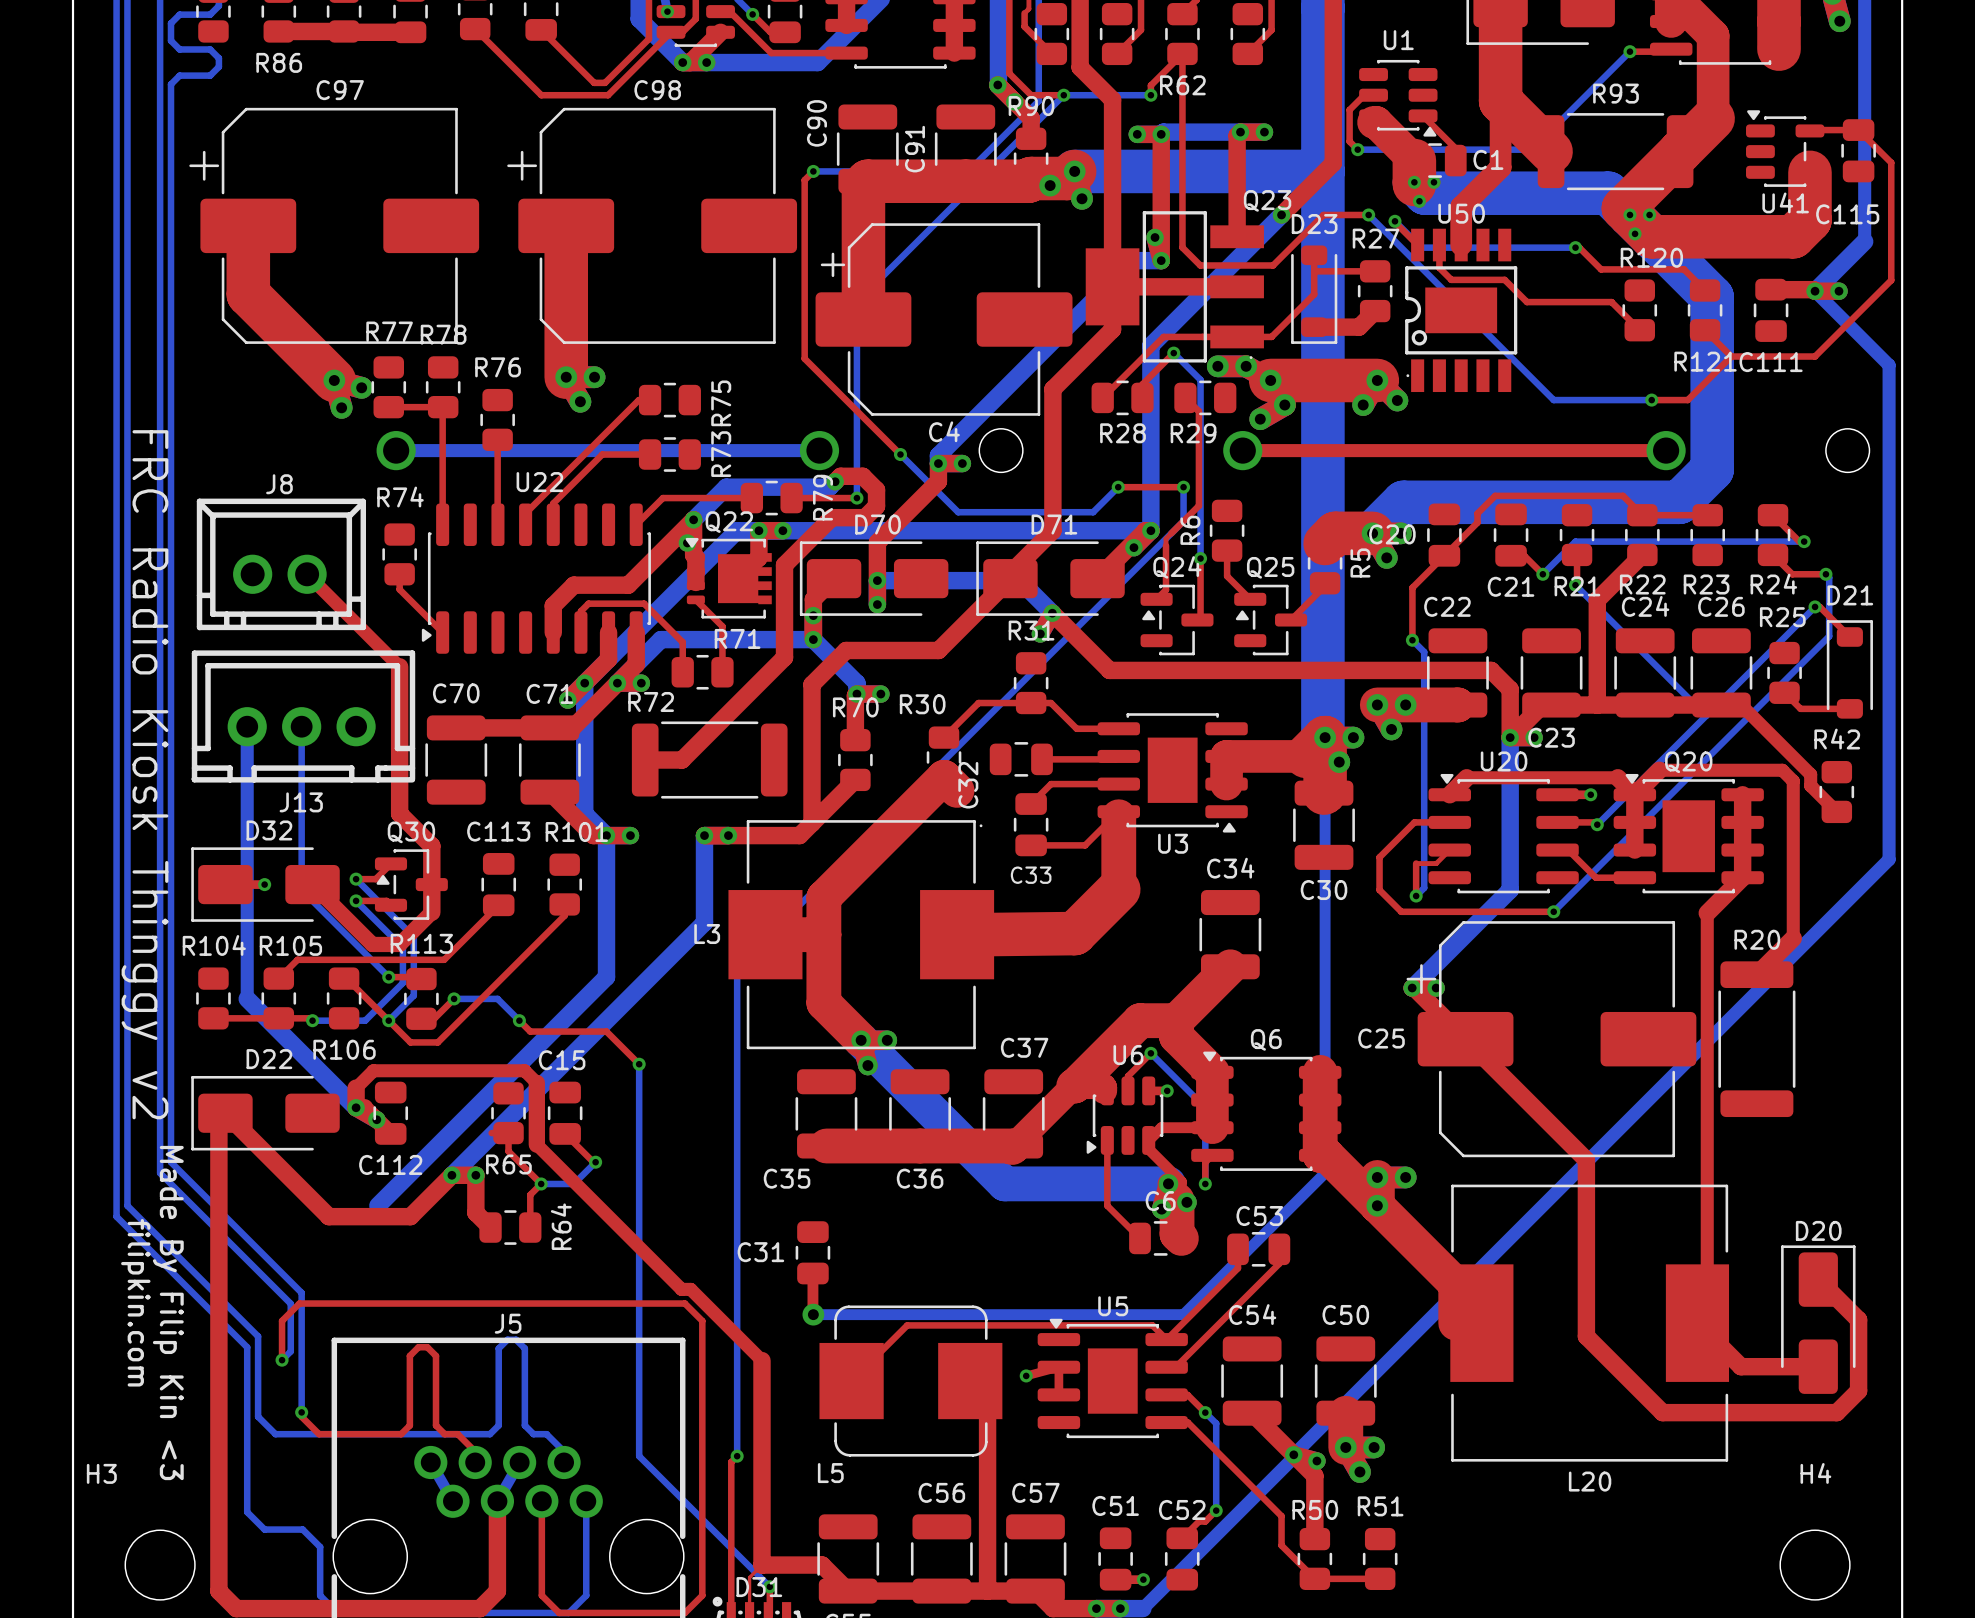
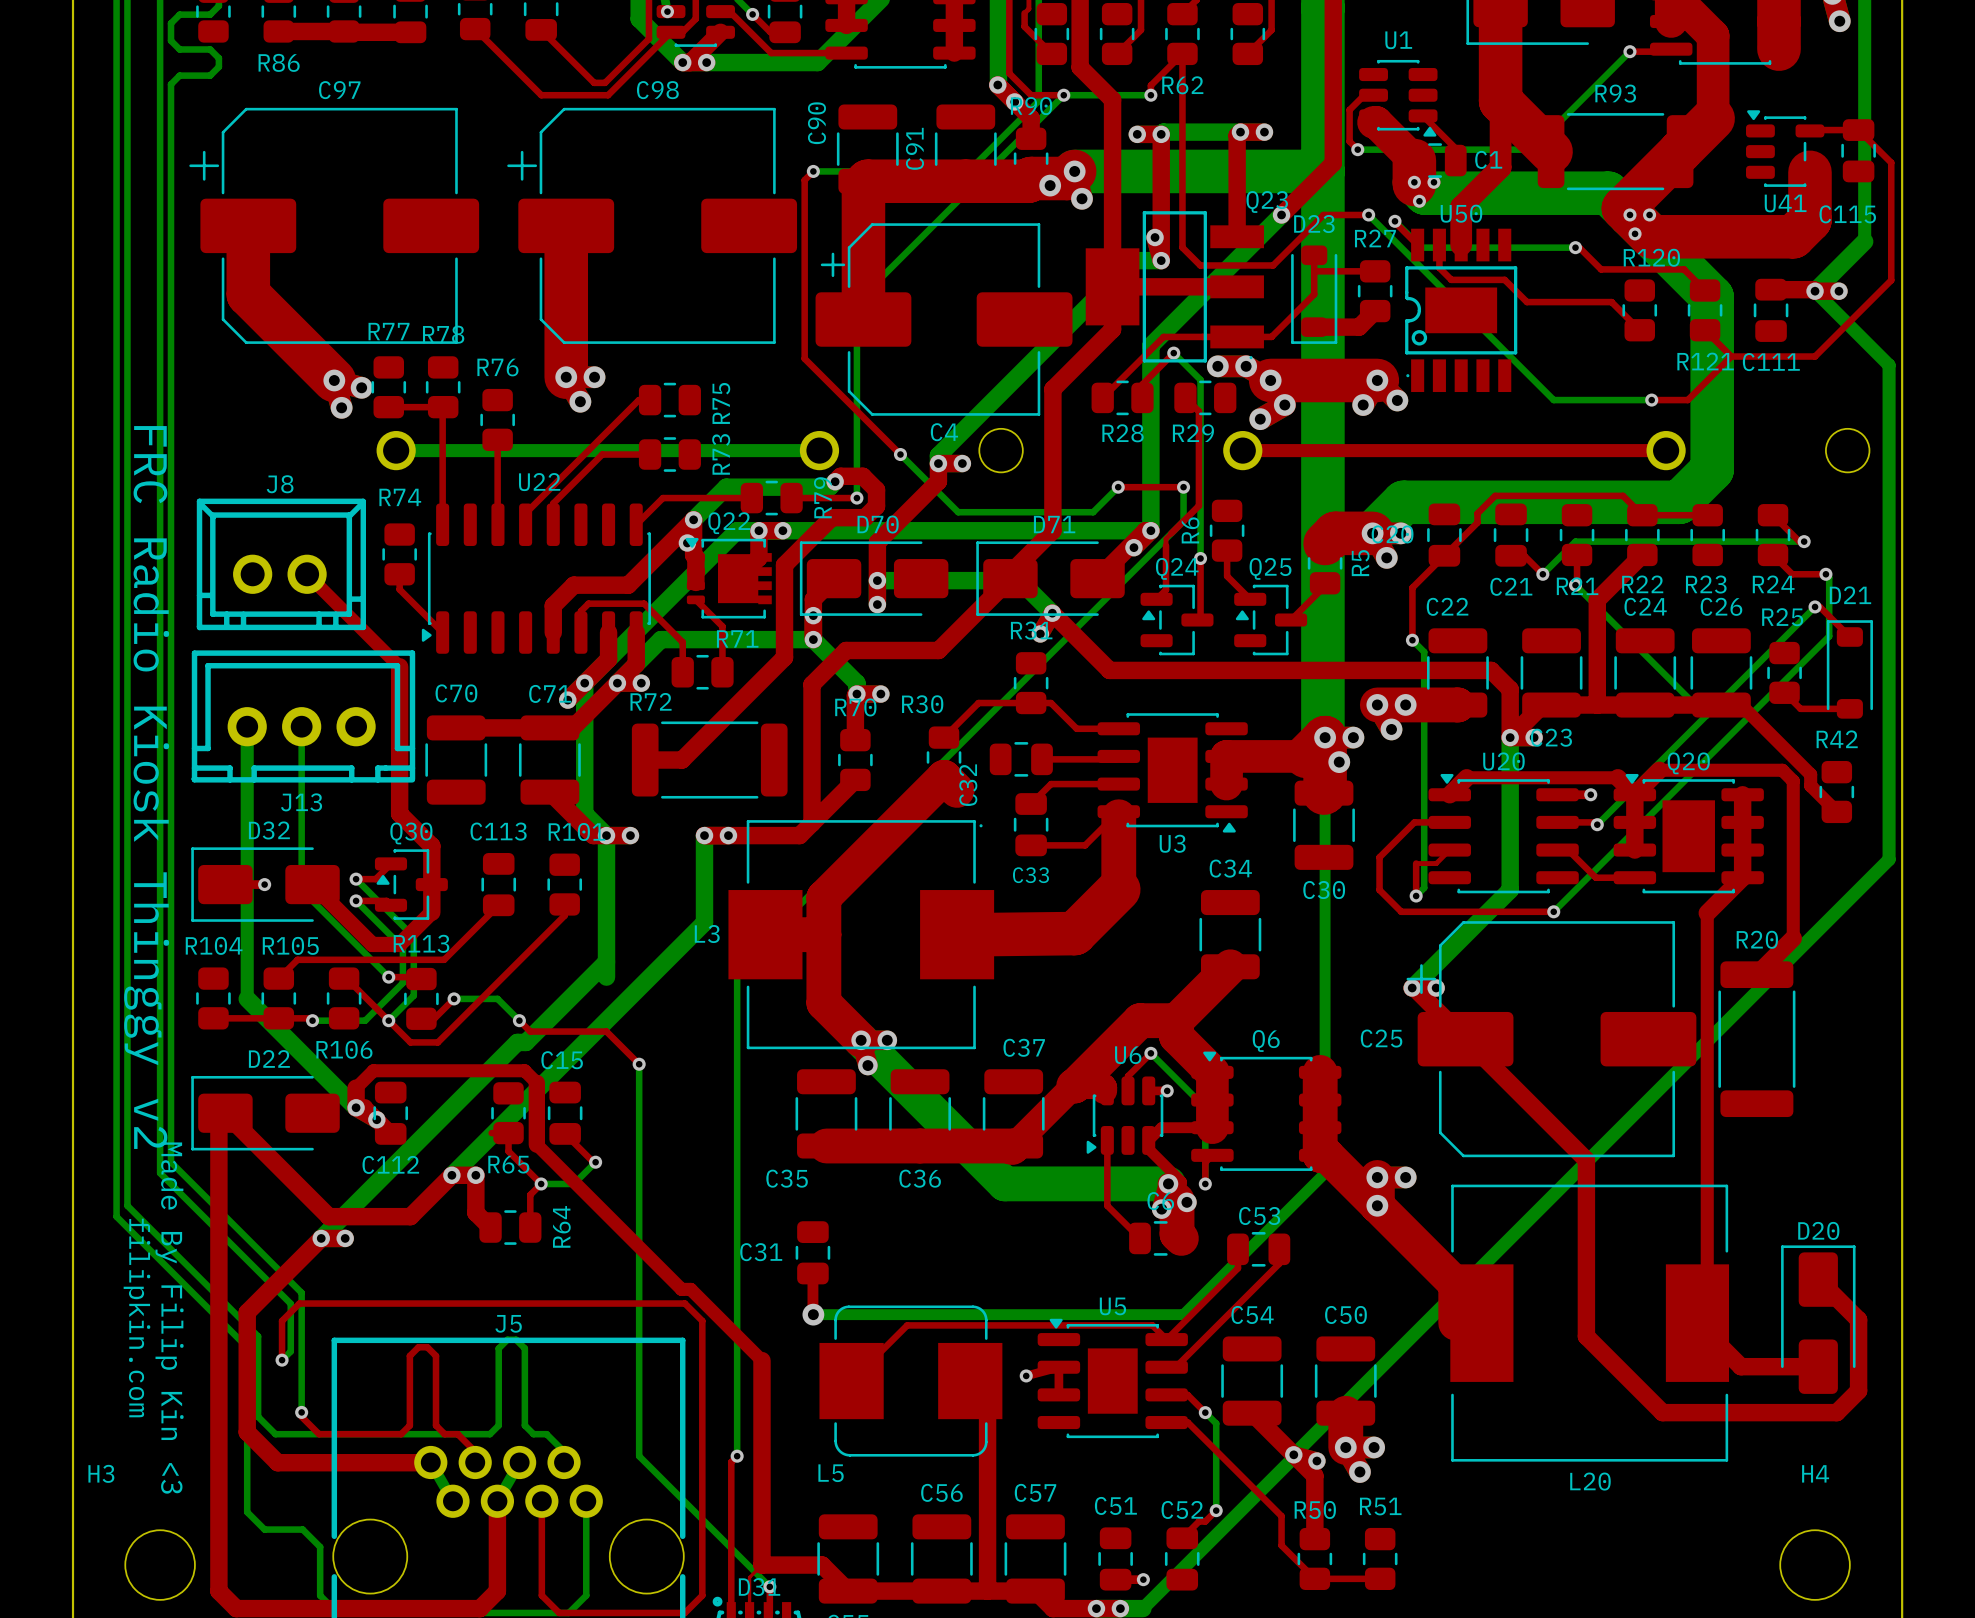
bottom track: none -> (606, 961) (525, 1042) (517, 1042) (321, 1238) (345, 1238)
bottom track: (606, 977) (377, 1205) -> none
via: none -> (321, 1238)
top track: none -> (345, 1238) (321, 1238) (247, 1312) (247, 1432) (277, 1462) (430, 1462)
via: none -> (345, 1238)

